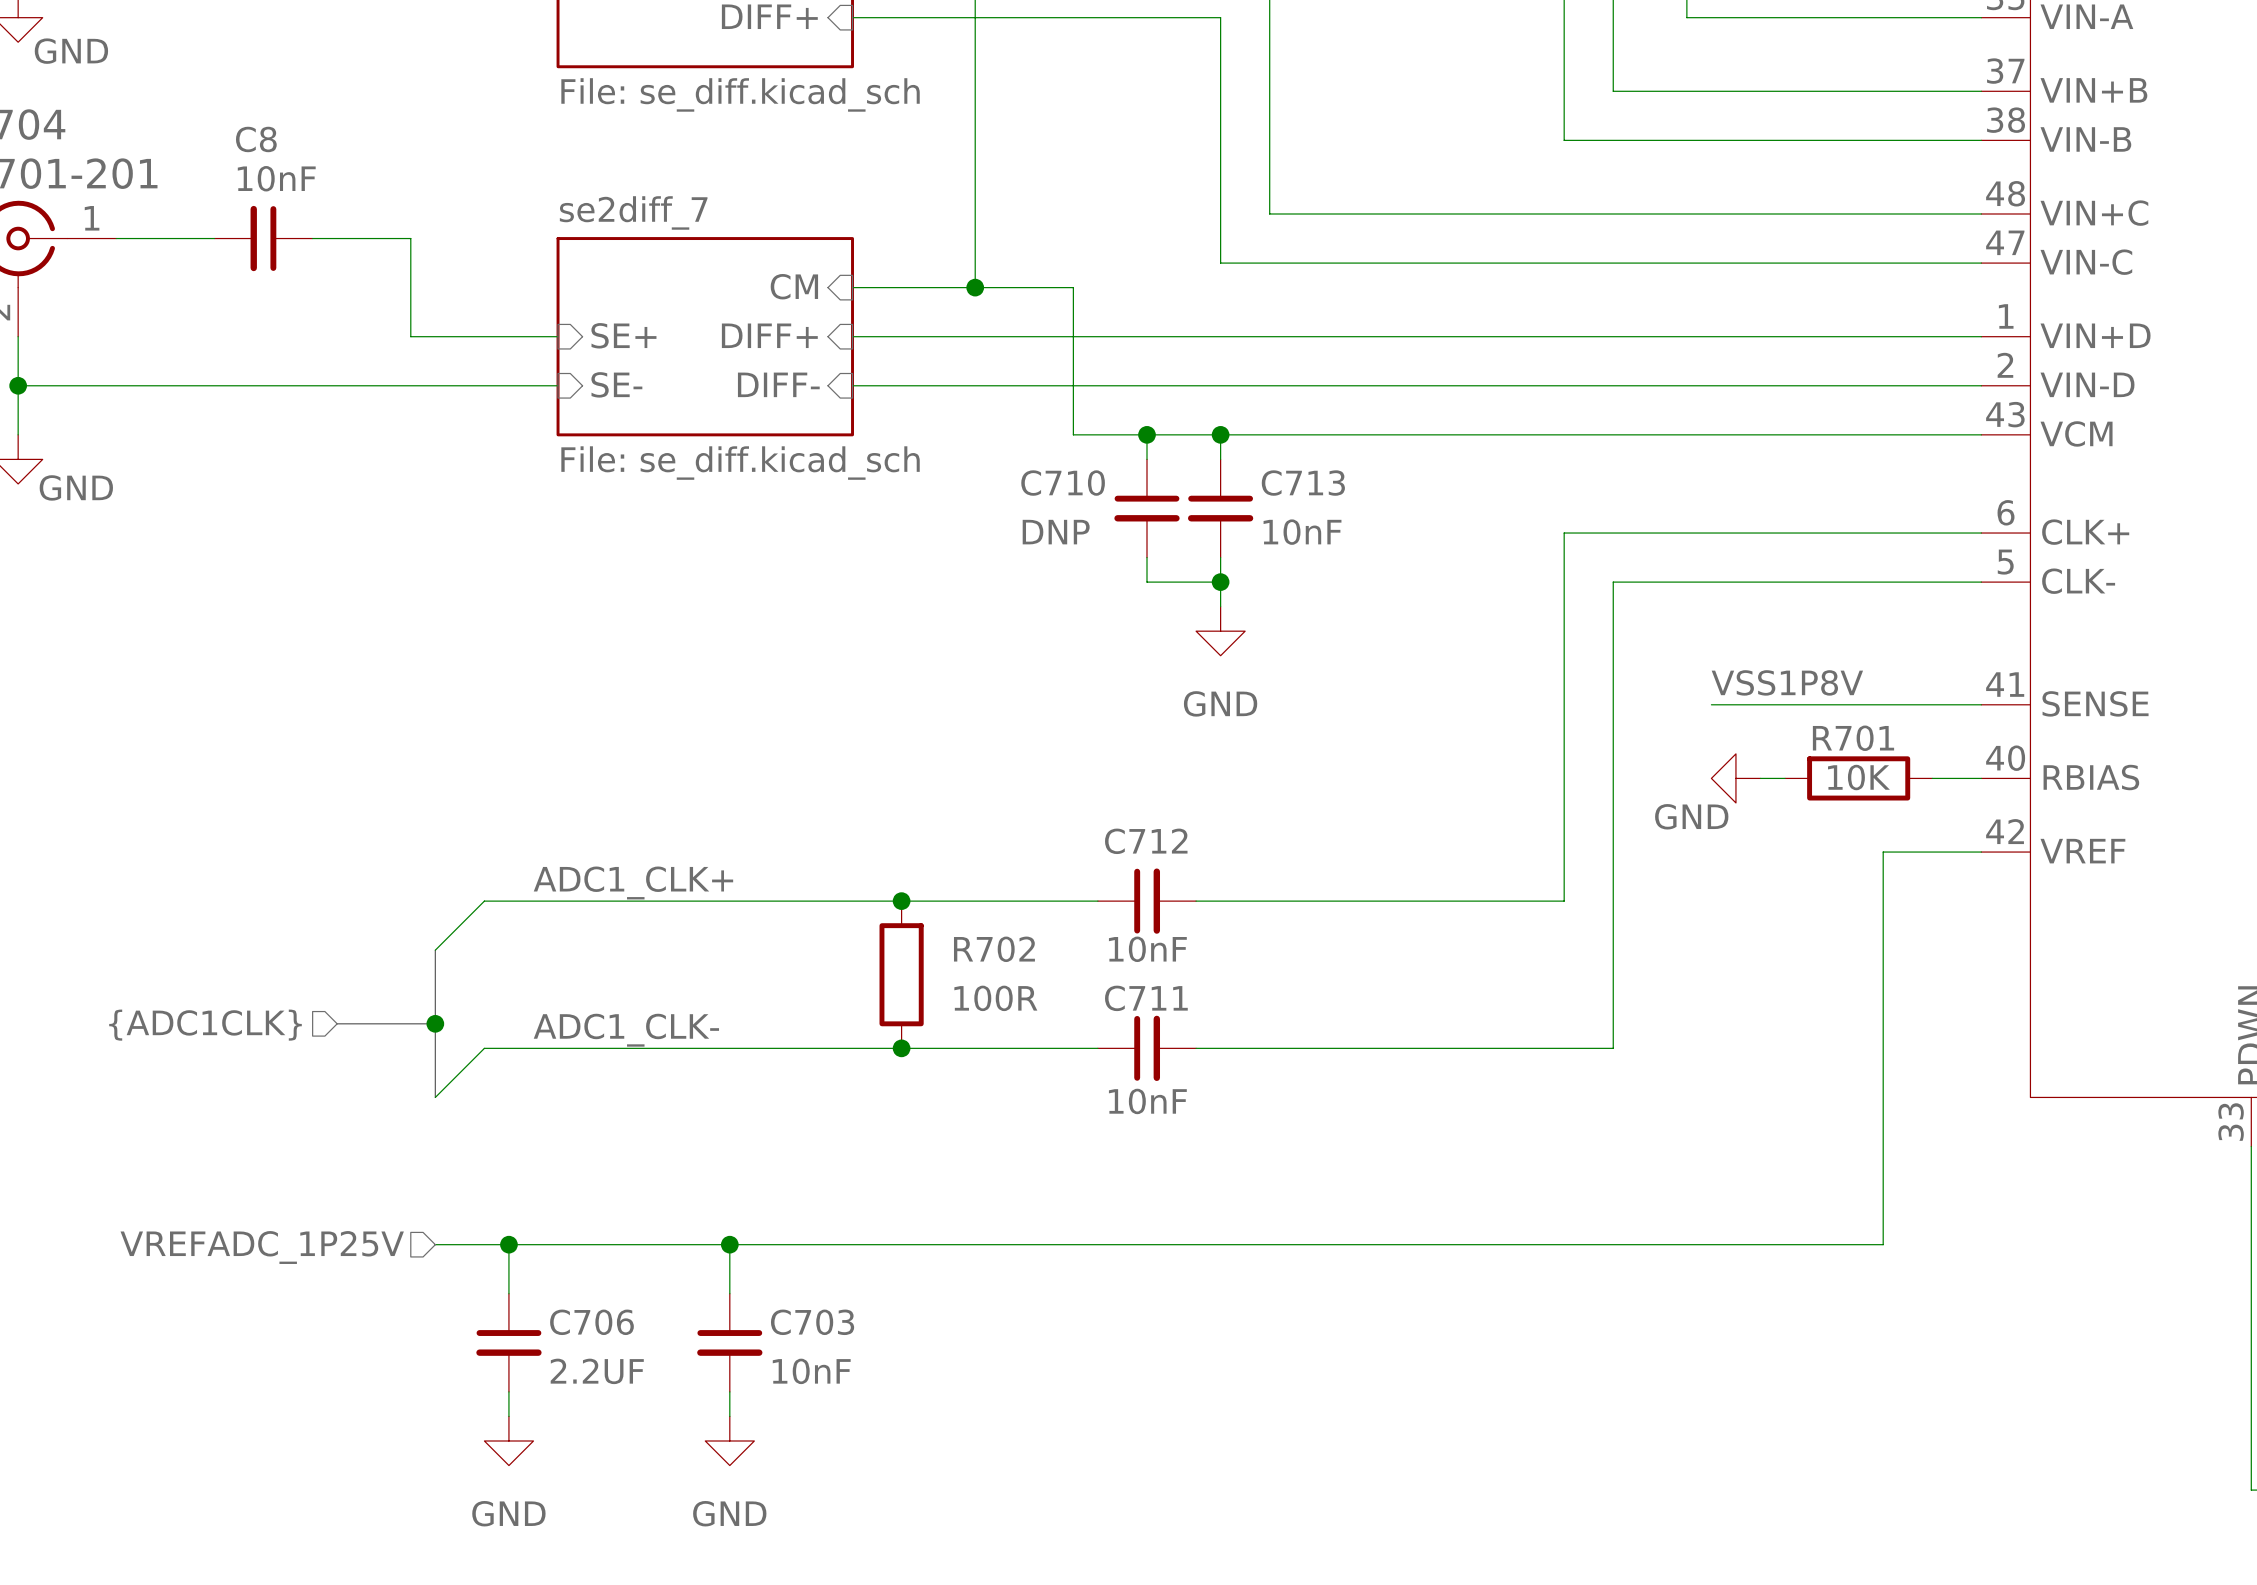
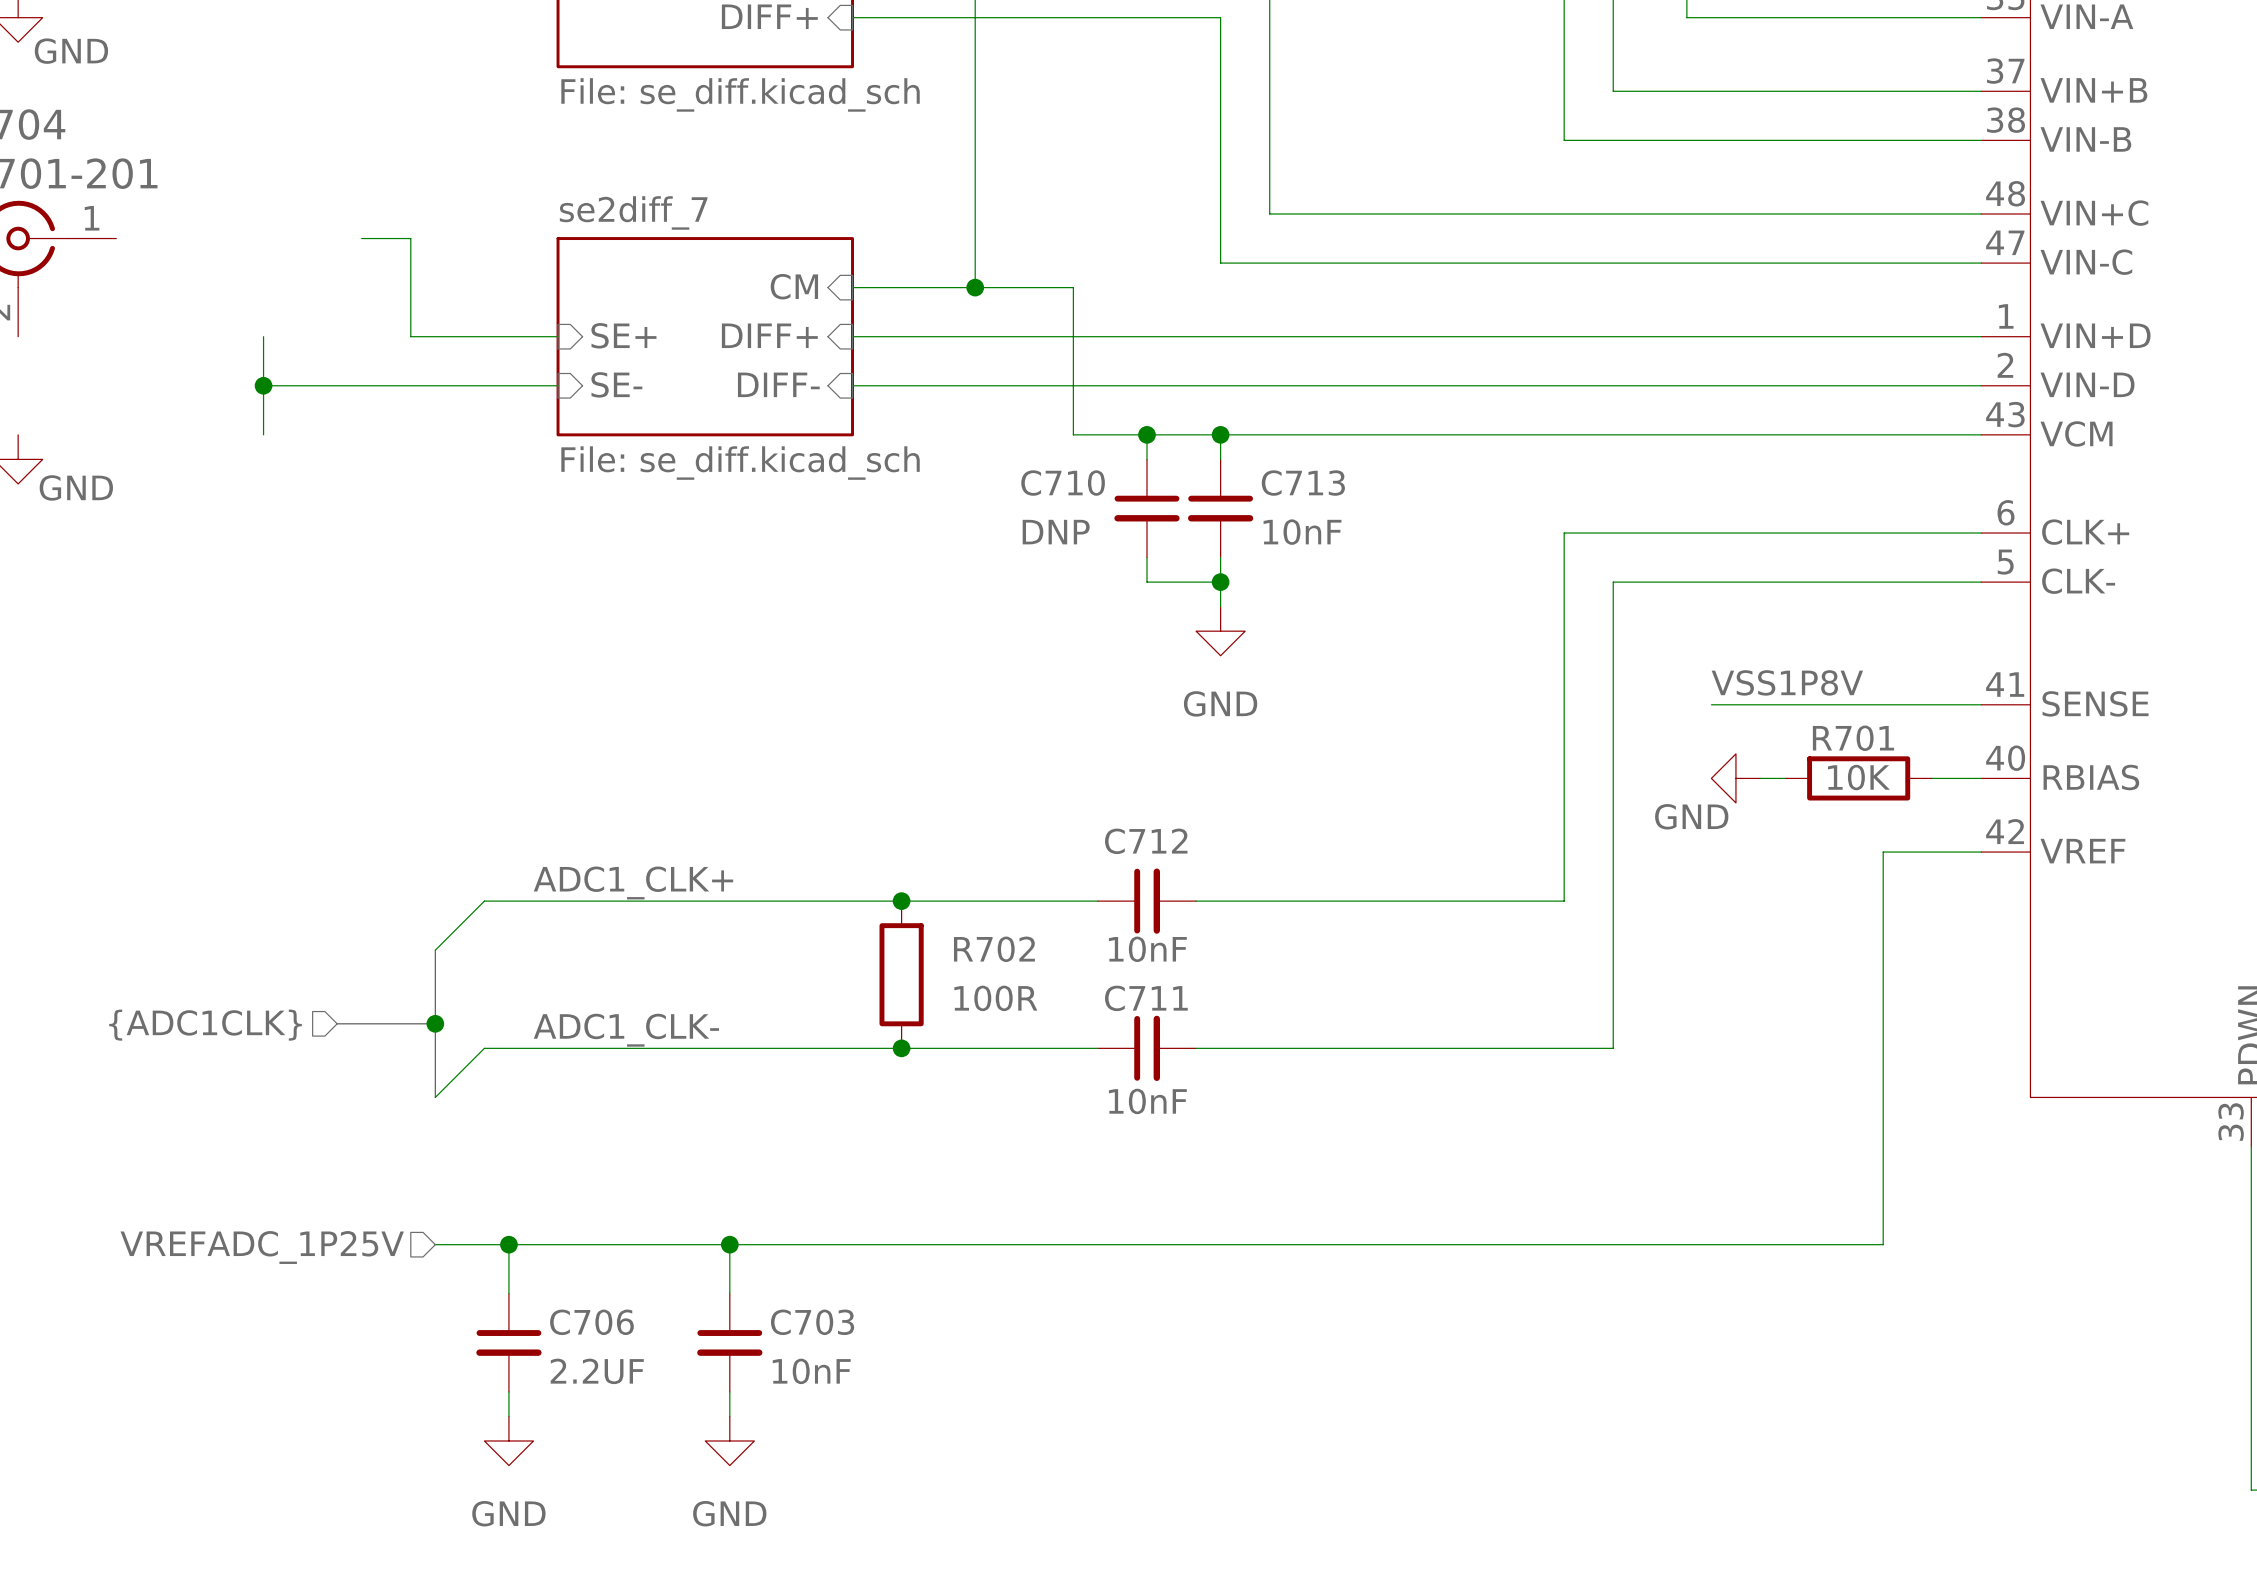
wire: (116, 238) (214, 238) -> none
C8: 10nF (263, 238) -> none
wire: (312, 238) (361, 238) -> none
wire: (18, 336) (18, 434) -> (263, 336) (263, 434)
wire: (18, 385) (263, 385) -> none
junction: (18, 385) -> none
junction: none -> (263, 385)

